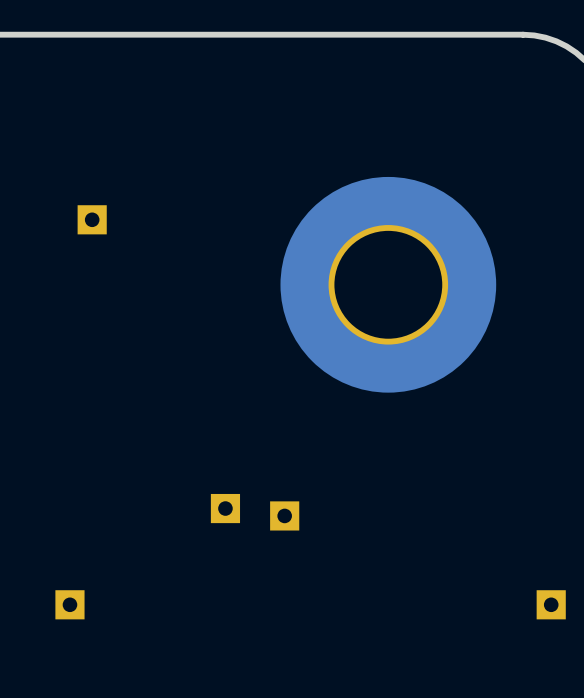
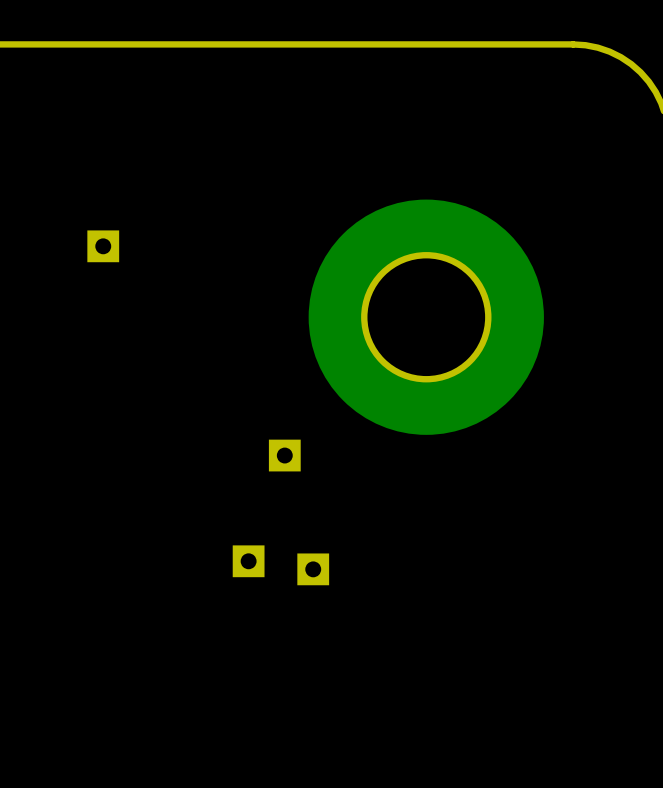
part: none -> (284, 455)
part: (69, 604) -> none
part: (551, 604) -> none

